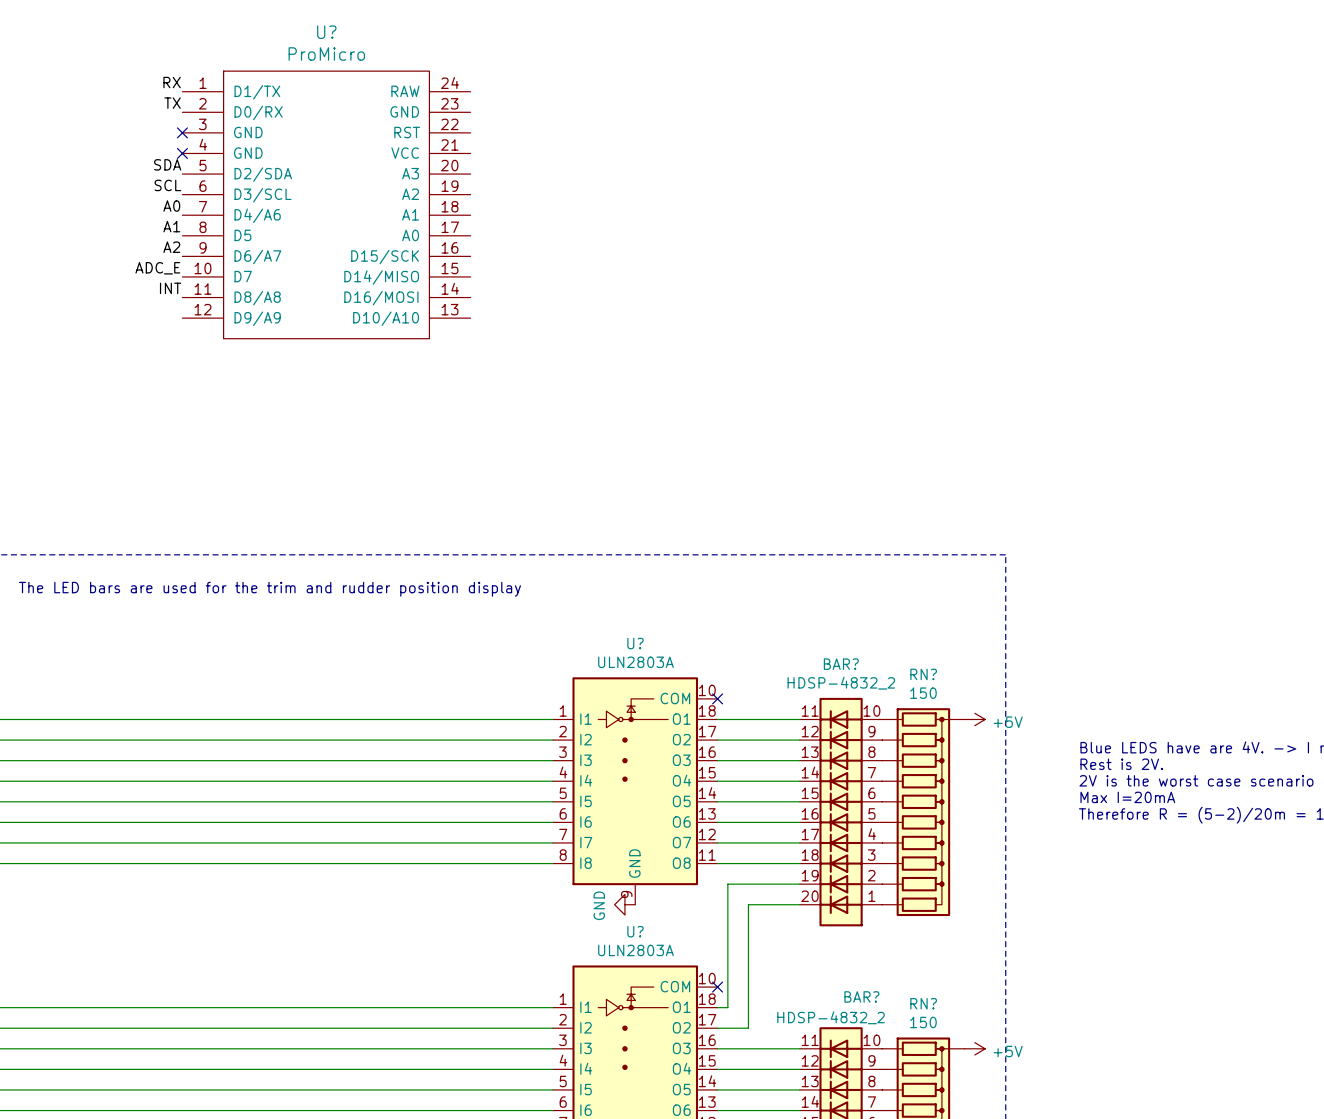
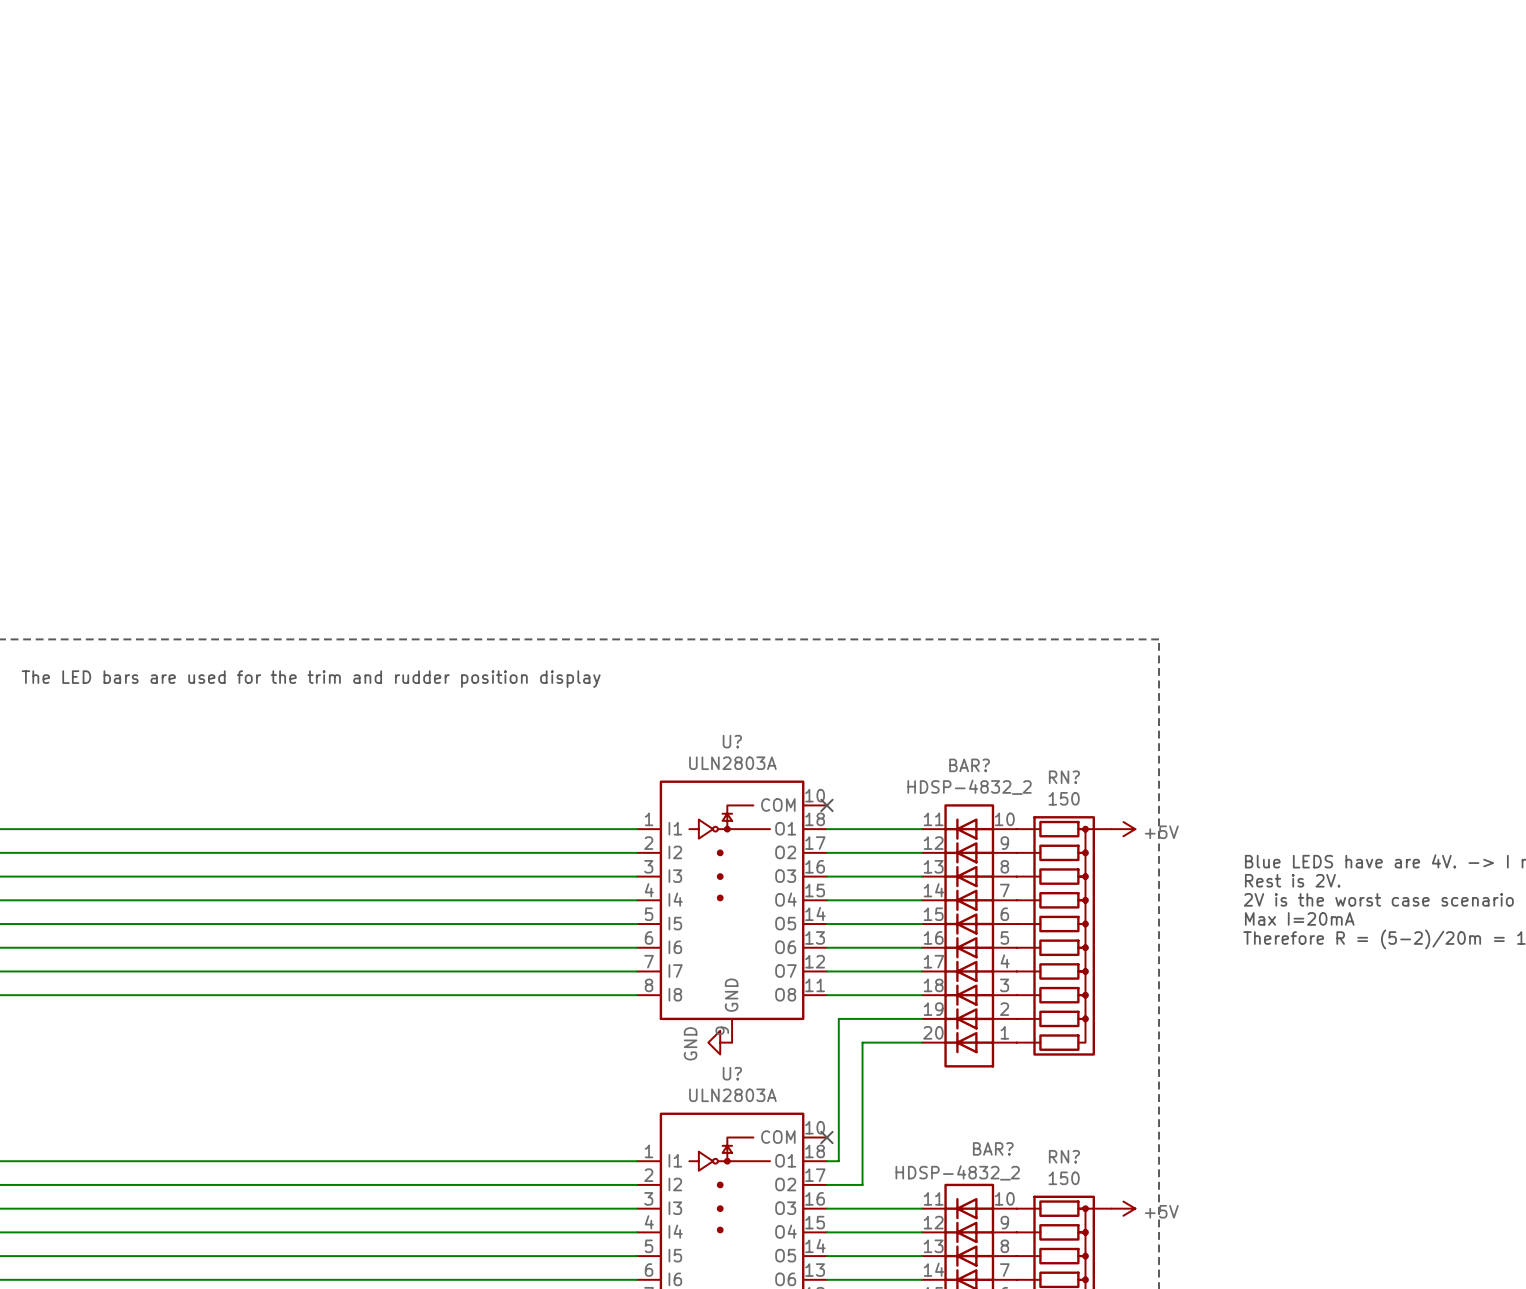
label: RX (172, 82) -> none
label: TX (172, 103) -> none
no-connect mark: (182, 132) -> none
no-connect mark: (182, 153) -> none
label: SDA (167, 164) -> none
label: SCL (167, 185) -> none
U?: ProMicro (326, 204) -> none
label: A0 (171, 206) -> none
label: A1 (171, 226) -> none
label: A2 (171, 247) -> none
label: ADC_E (157, 268) -> none
label: INT (170, 288) -> none

